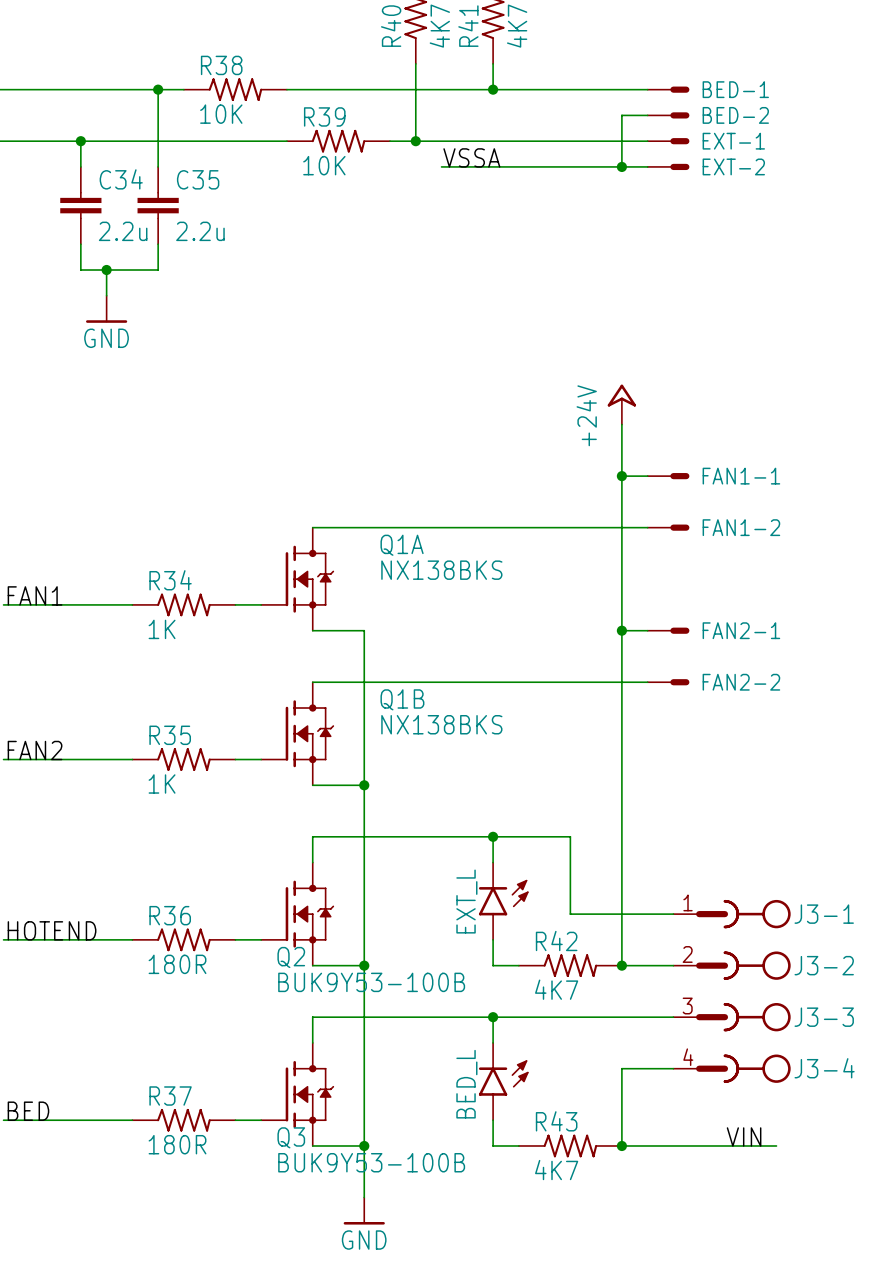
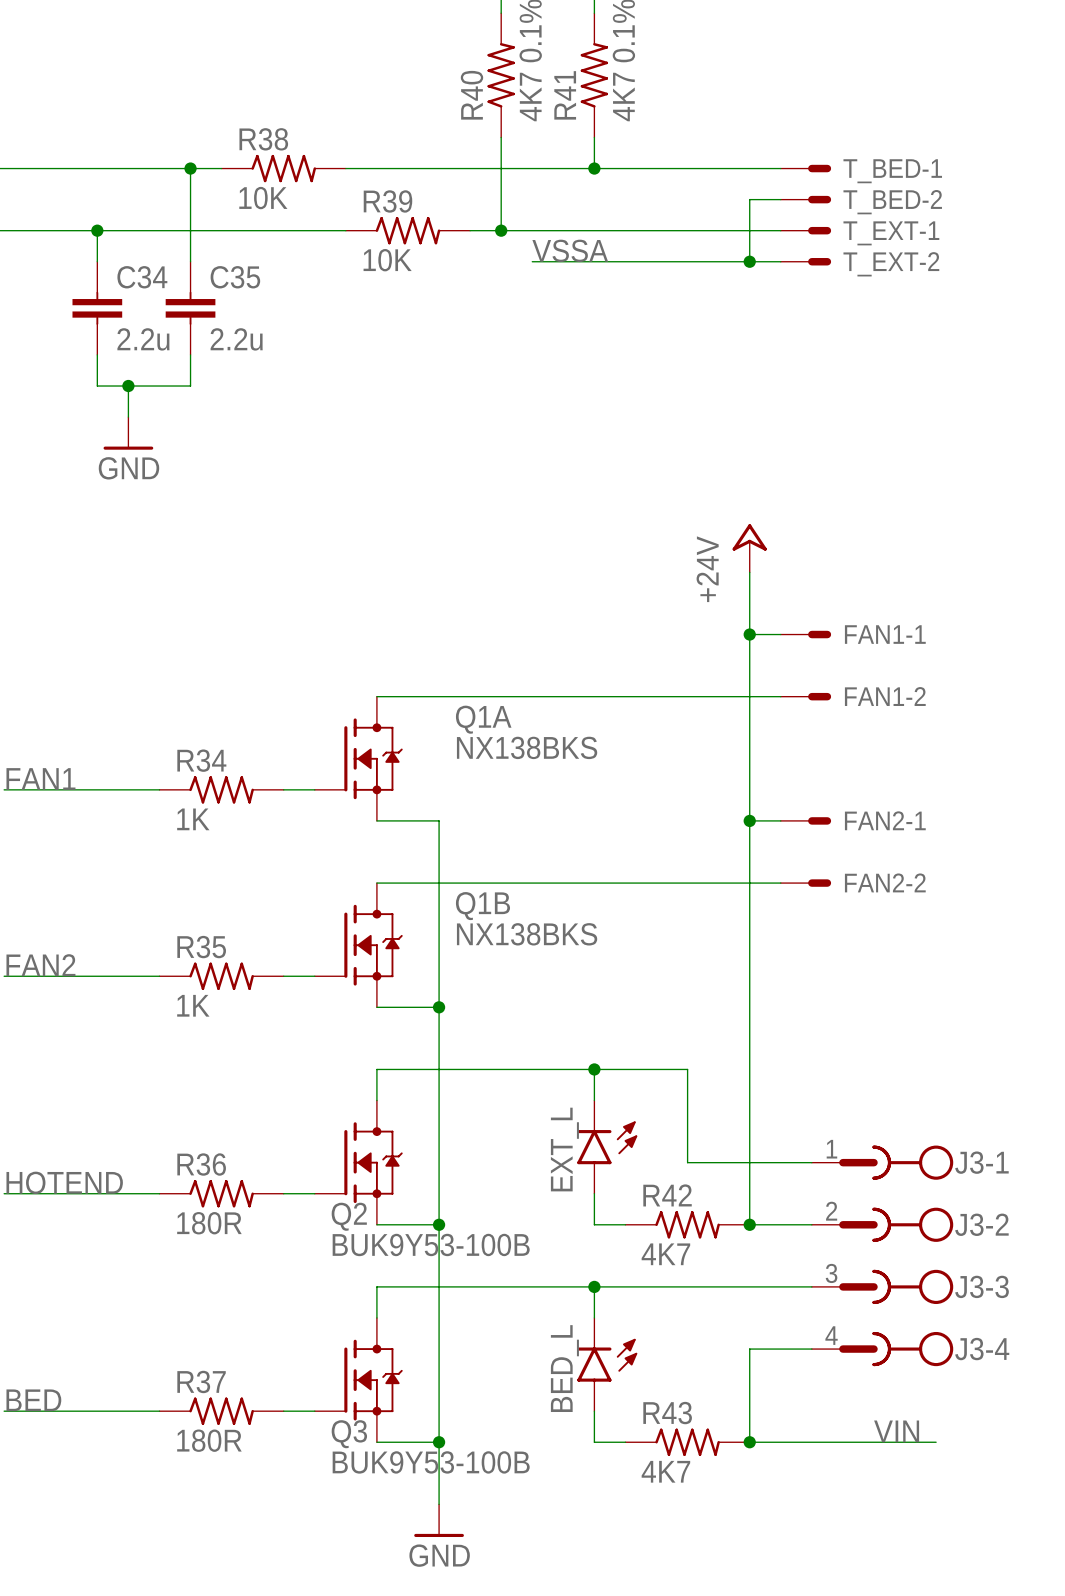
BED-1 name: BED-1 (735, 89) -> T_BED-1 (892, 171)
BED-2 name: BED-2 (735, 115) -> T_BED-2 (892, 202)
EXT-1 name: EXT-1 (733, 141) -> T_EXT-1 (891, 233)
EXT-2 name: EXT-2 (733, 166) -> T_EXT-2 (891, 264)

